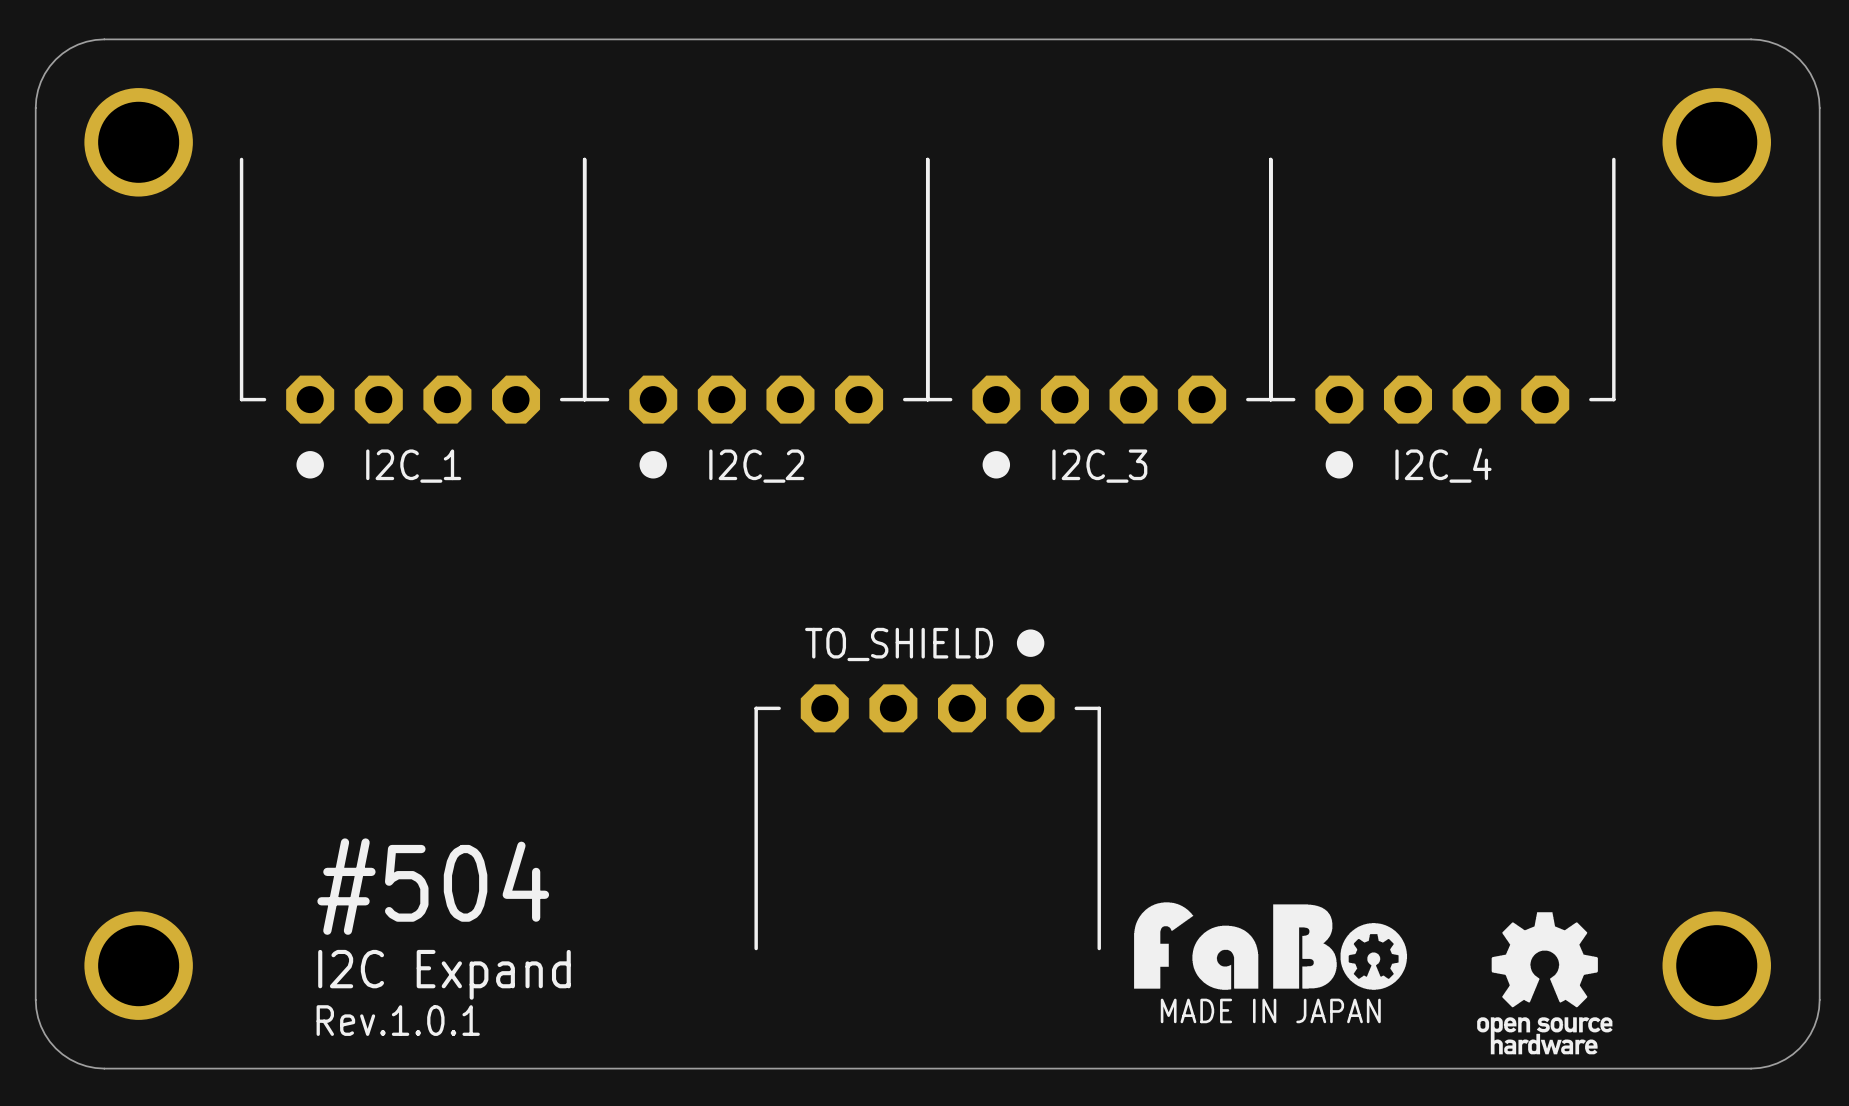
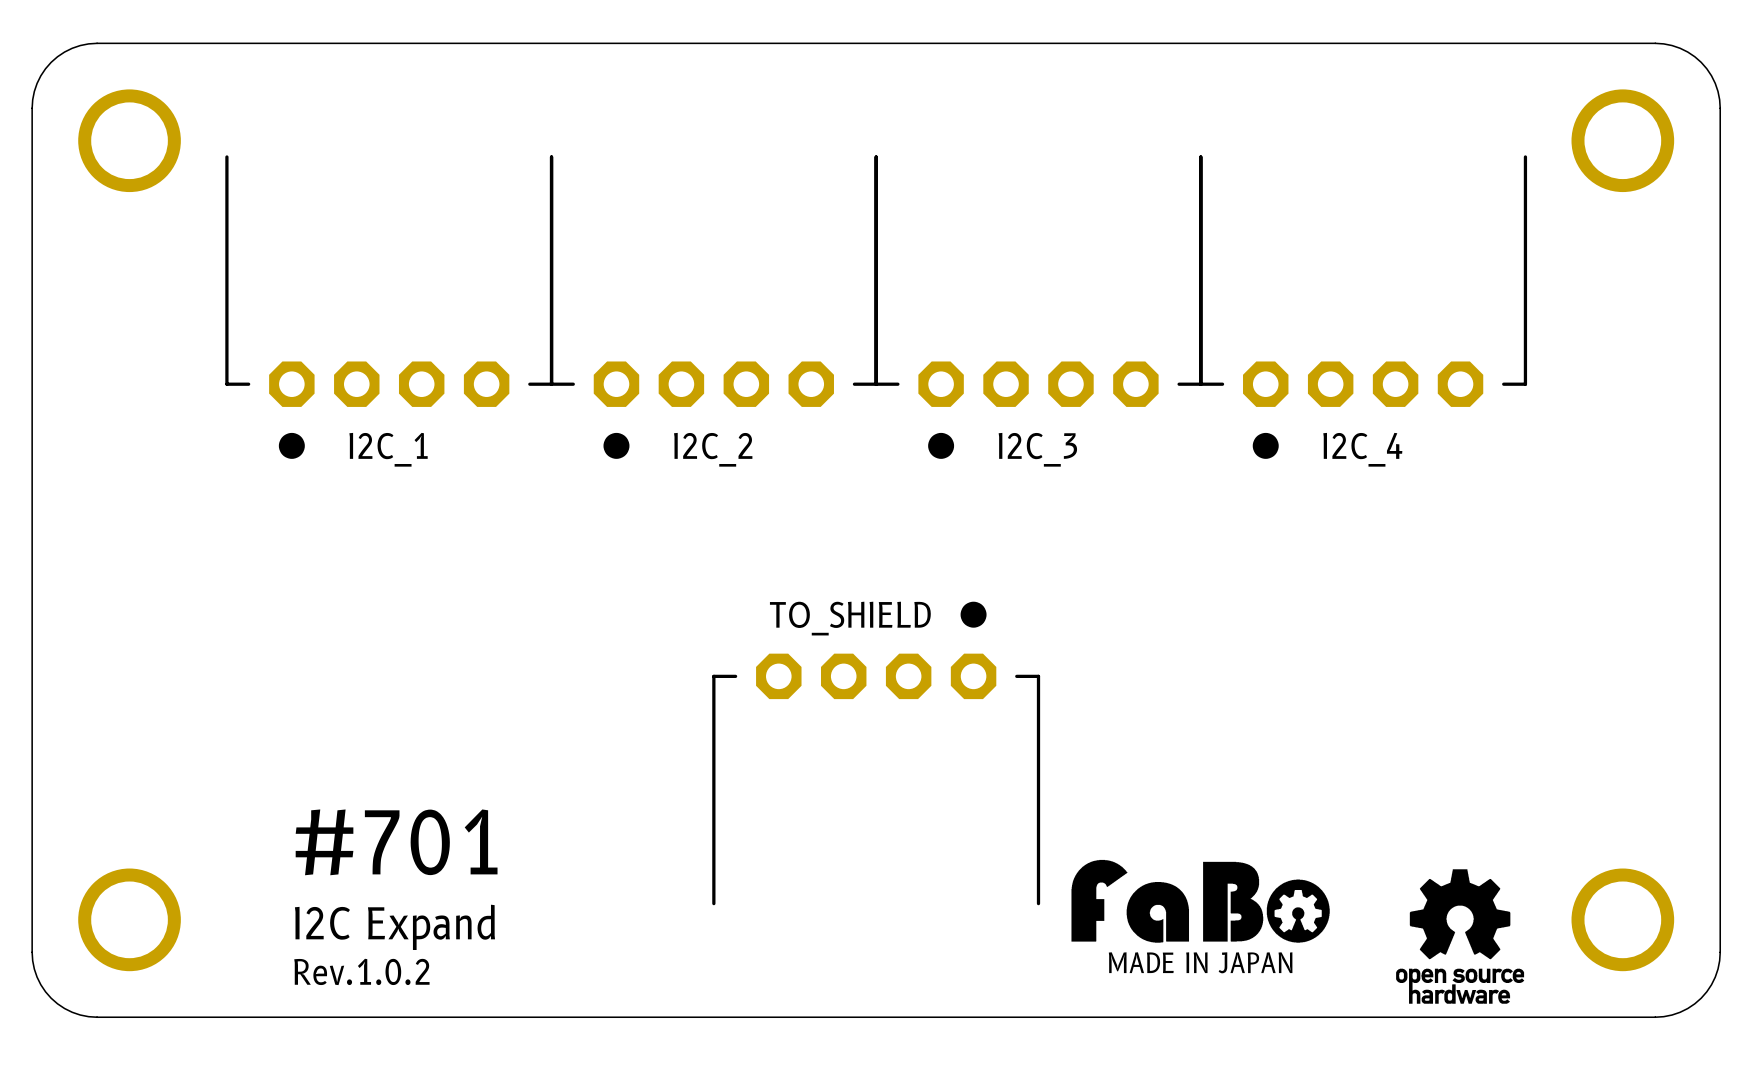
text: #504 (433, 886) -> #701 (396, 842)
text: Rev.1.0.1 (398, 1020) -> Rev.1.0.2 (361, 971)

